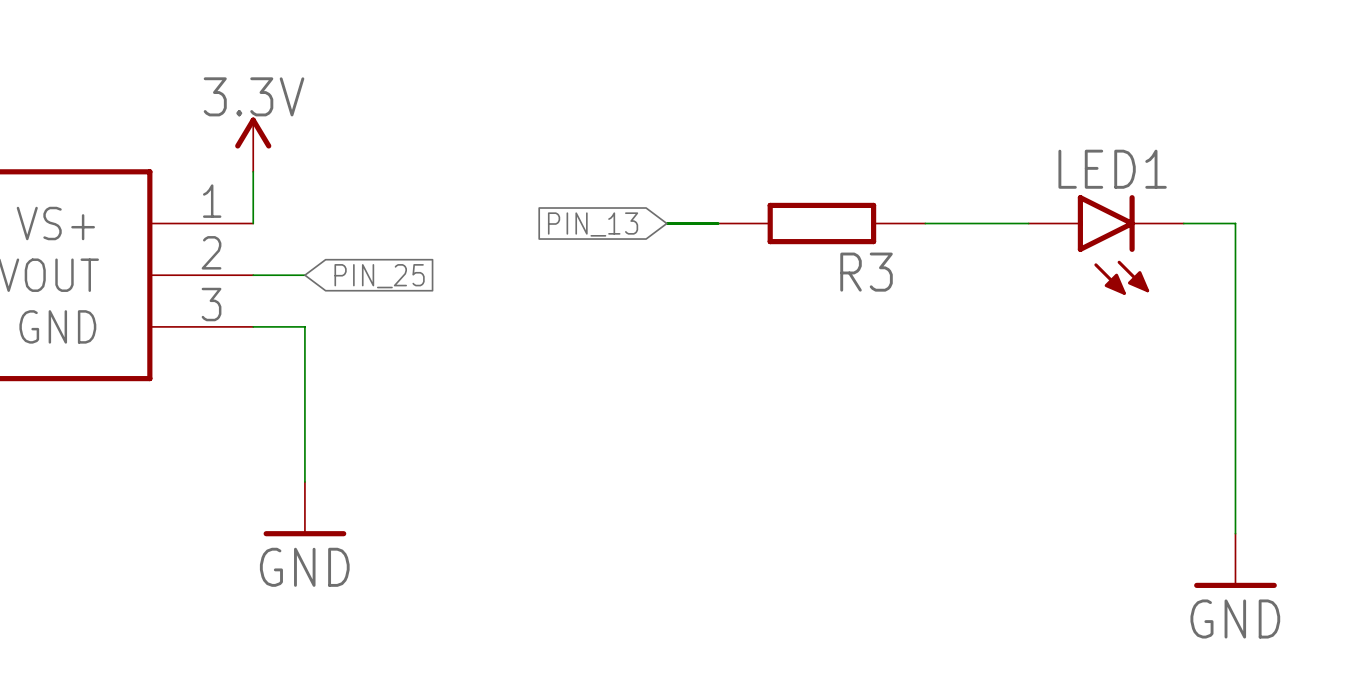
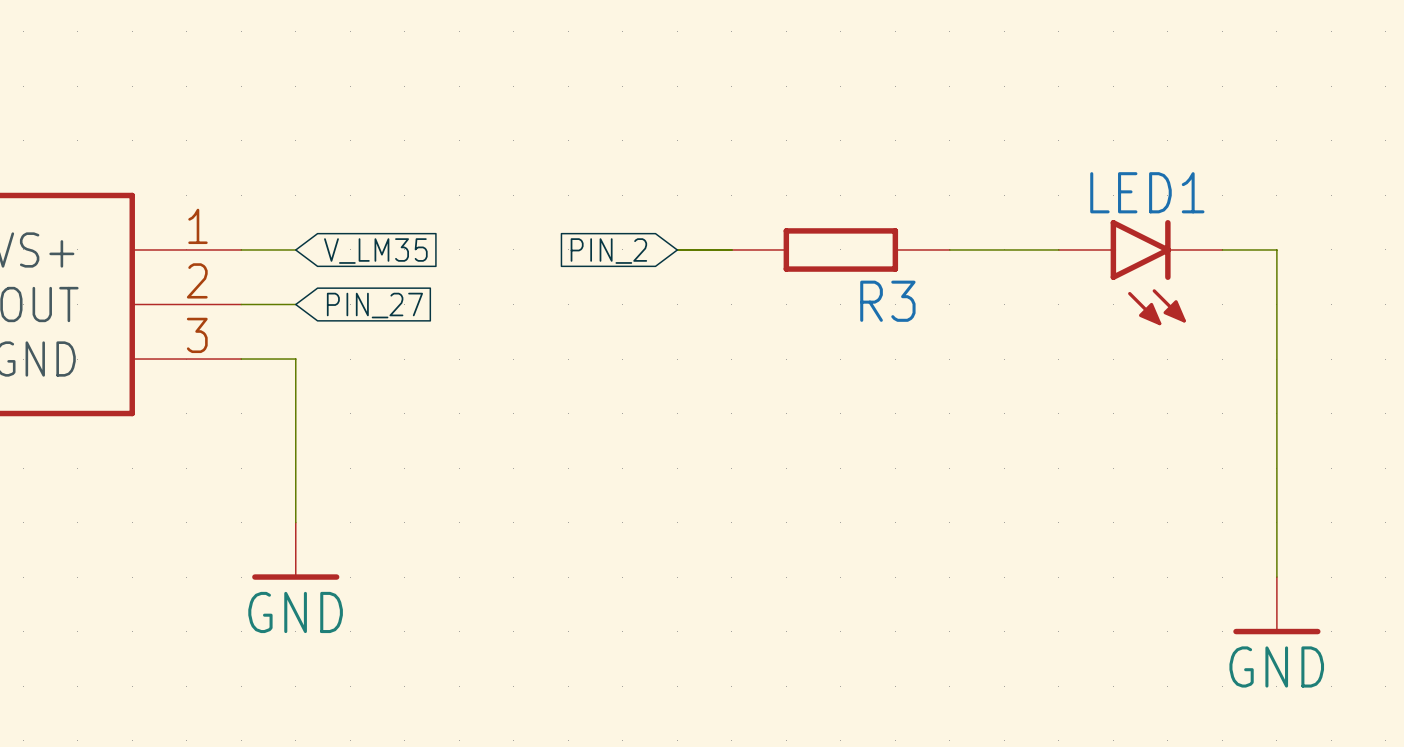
power symbol: 3.3V (253, 144) -> none
wire: (253, 171) (253, 223) -> (295, 249) (241, 249)
global label: none -> V_LM35 (375, 251)
global label: PIN_13 (593, 224) -> PIN_2 (608, 251)
global label: PIN_25 (379, 276) -> PIN_27 (374, 305)

